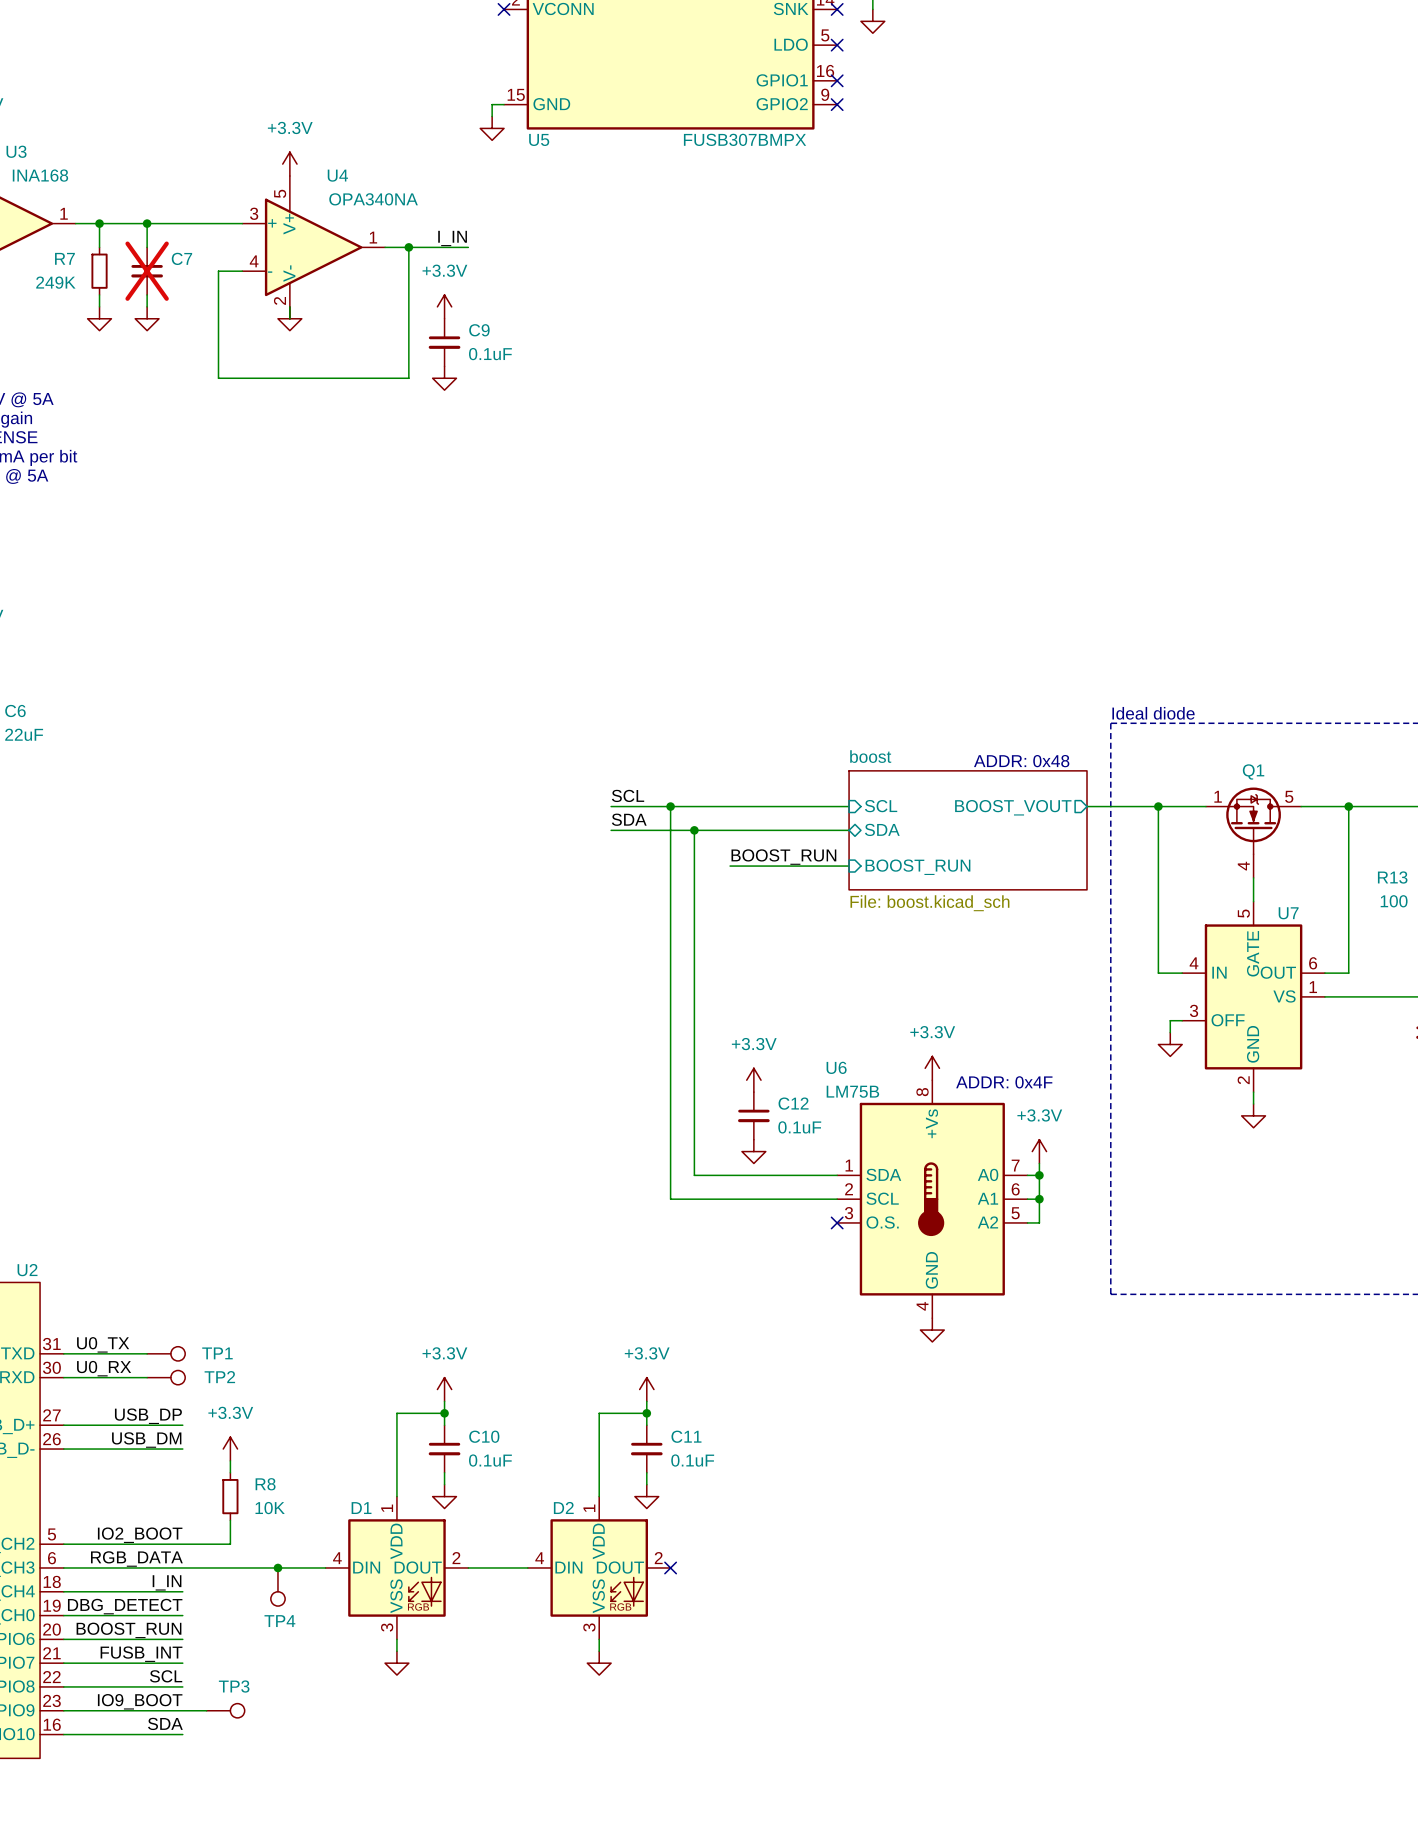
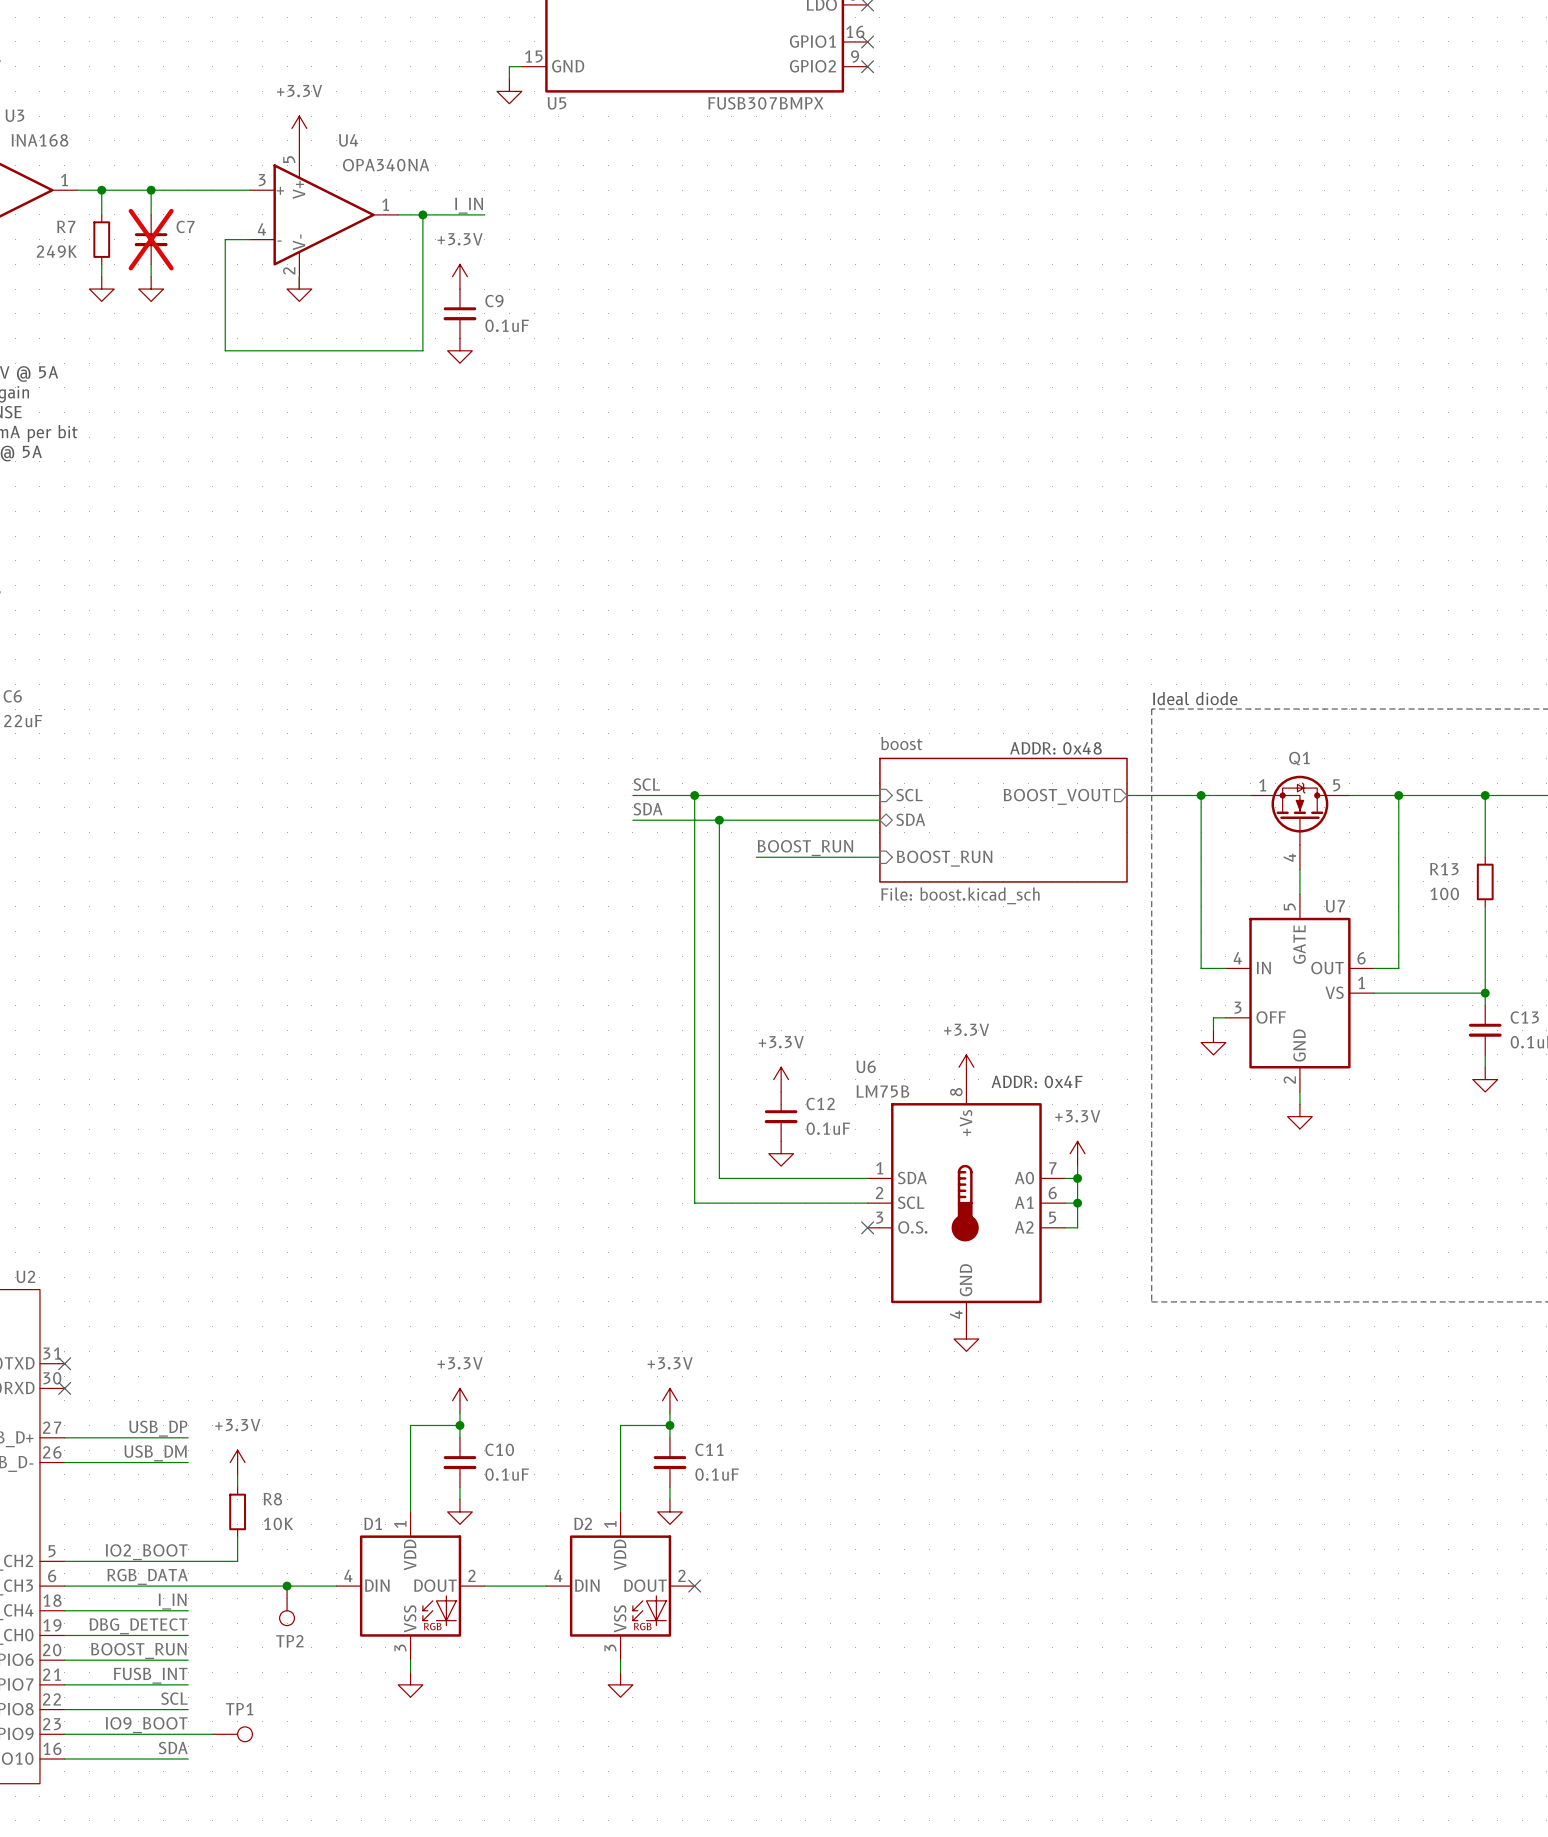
label: U0_TX (103, 1344) -> none
wire: (63, 1353) (147, 1353) -> none
no-connect mark: none -> (64, 1363)
TP1: (166, 1353) -> none
label: U0_RX (104, 1368) -> none
wire: (63, 1377) (147, 1377) -> none
no-connect mark: none -> (64, 1388)
TP2: (166, 1377) -> none
TP4 name: TP4 (279, 1621) -> TP2 (289, 1641)
TP3 name: TP3 (234, 1686) -> TP1 (239, 1709)

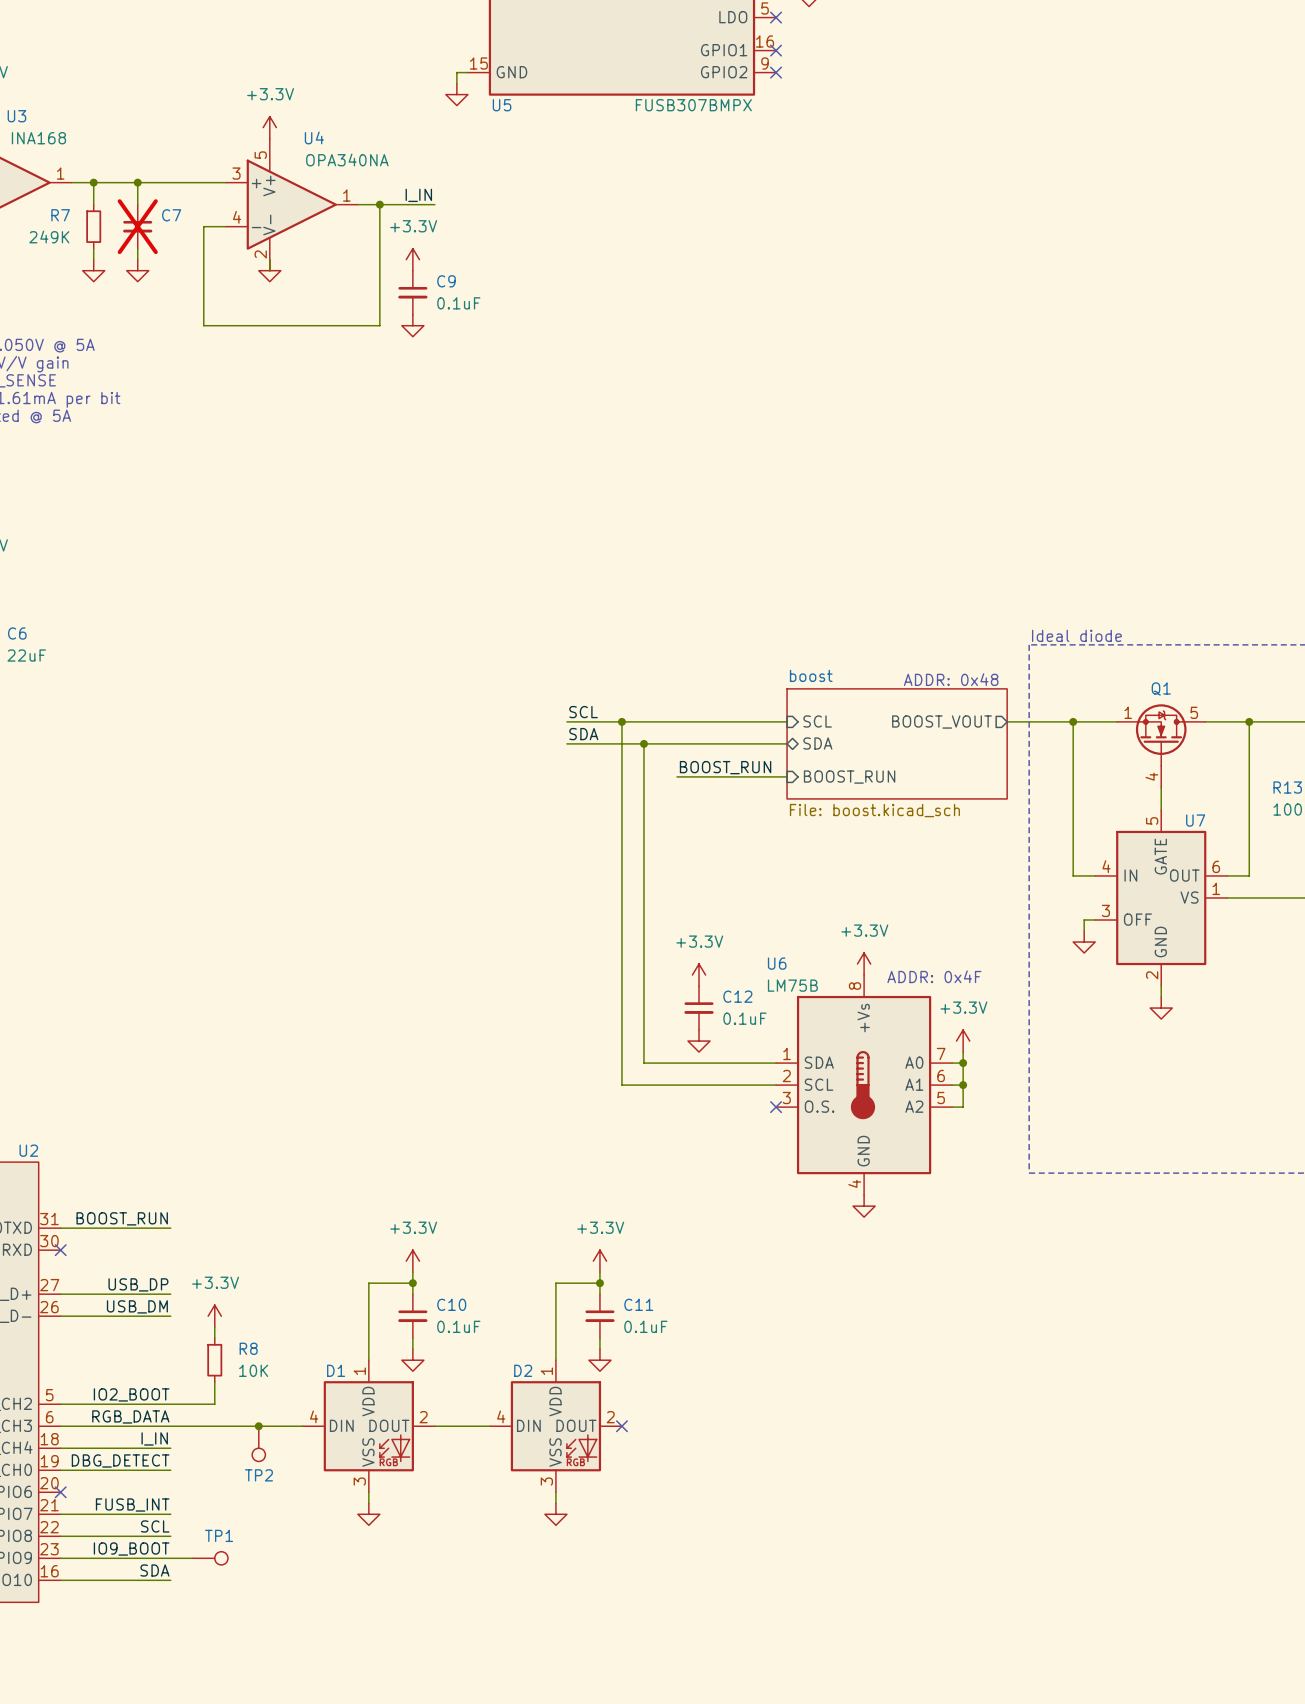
label: none -> BOOST_RUN (122, 1218)
wire: none -> (60, 1228) (170, 1228)
no-connect mark: (64, 1363) -> none
label: BOOST_RUN (138, 1651) -> none
wire: (64, 1660) (188, 1660) -> none
no-connect mark: none -> (60, 1492)

